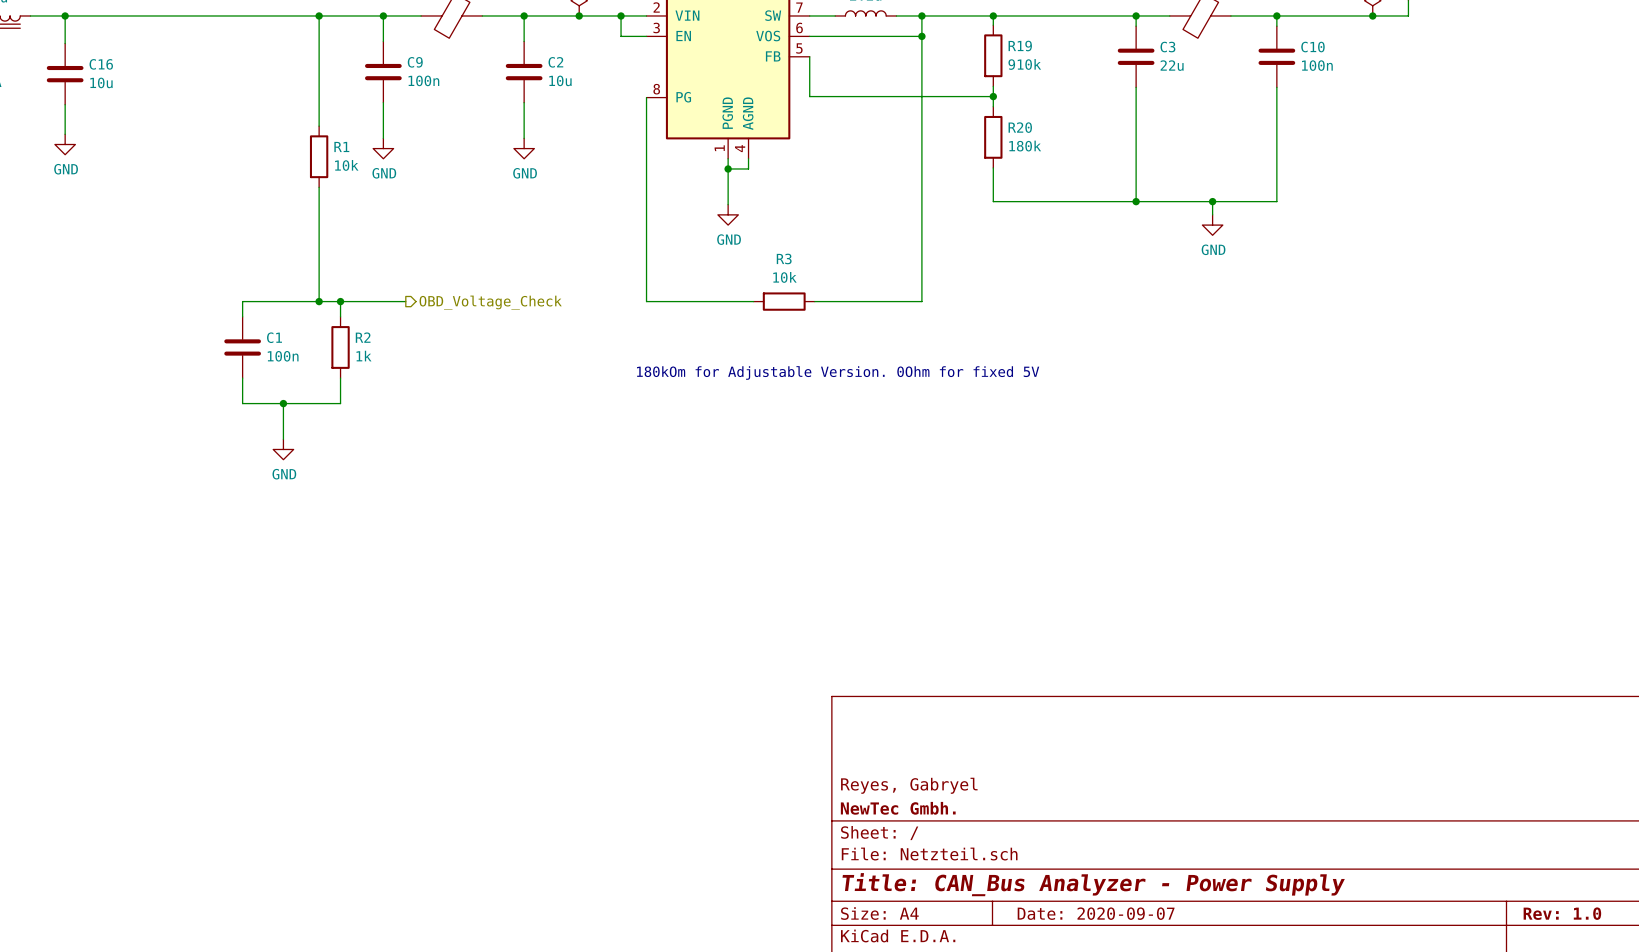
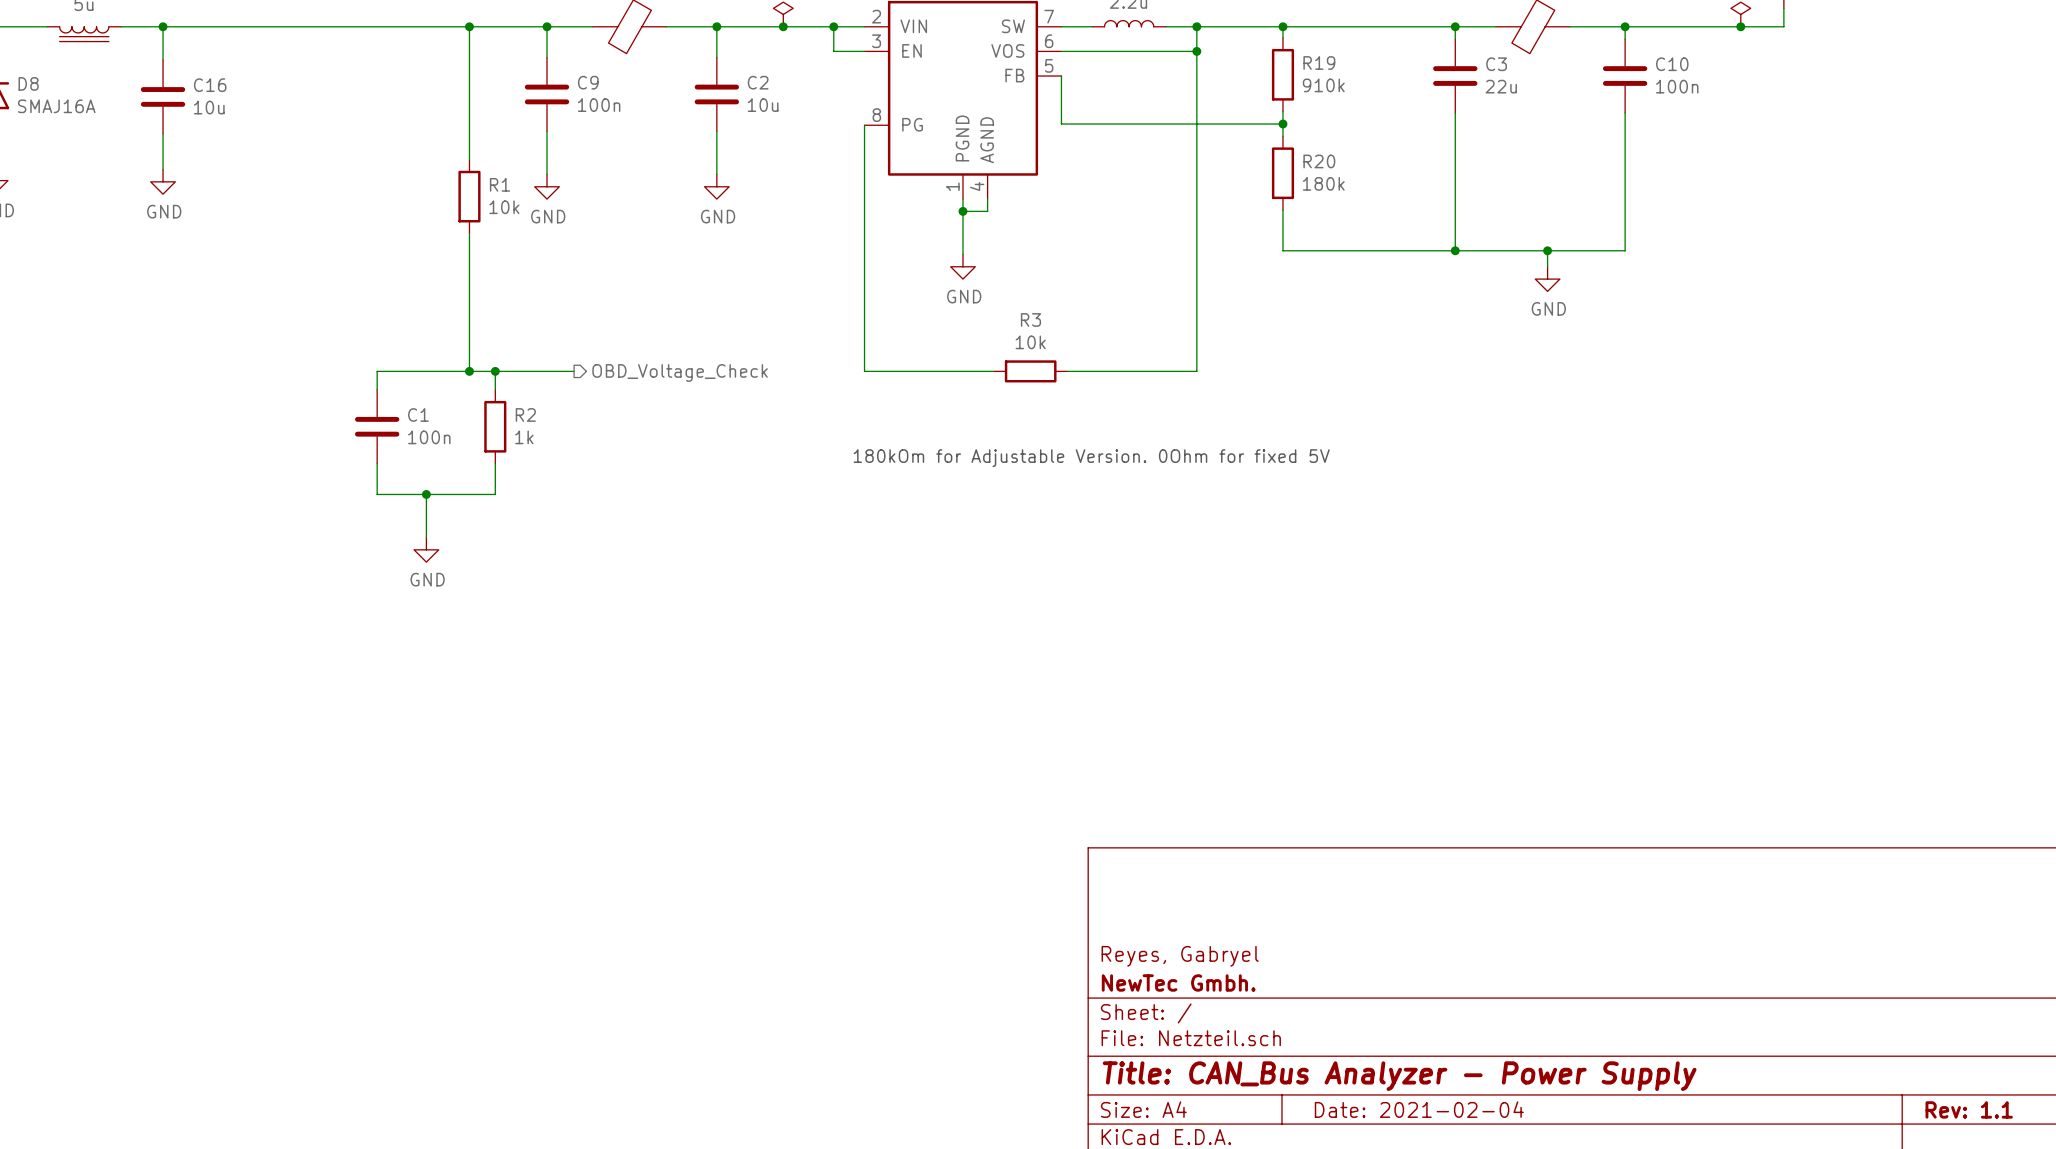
title block: Date: 2020-09-07 (1096, 913) -> Date: 2021-02-04 (1419, 1109)
title block: Rev: 1.0 (1562, 913) -> Rev: 1.1 (1969, 1109)

